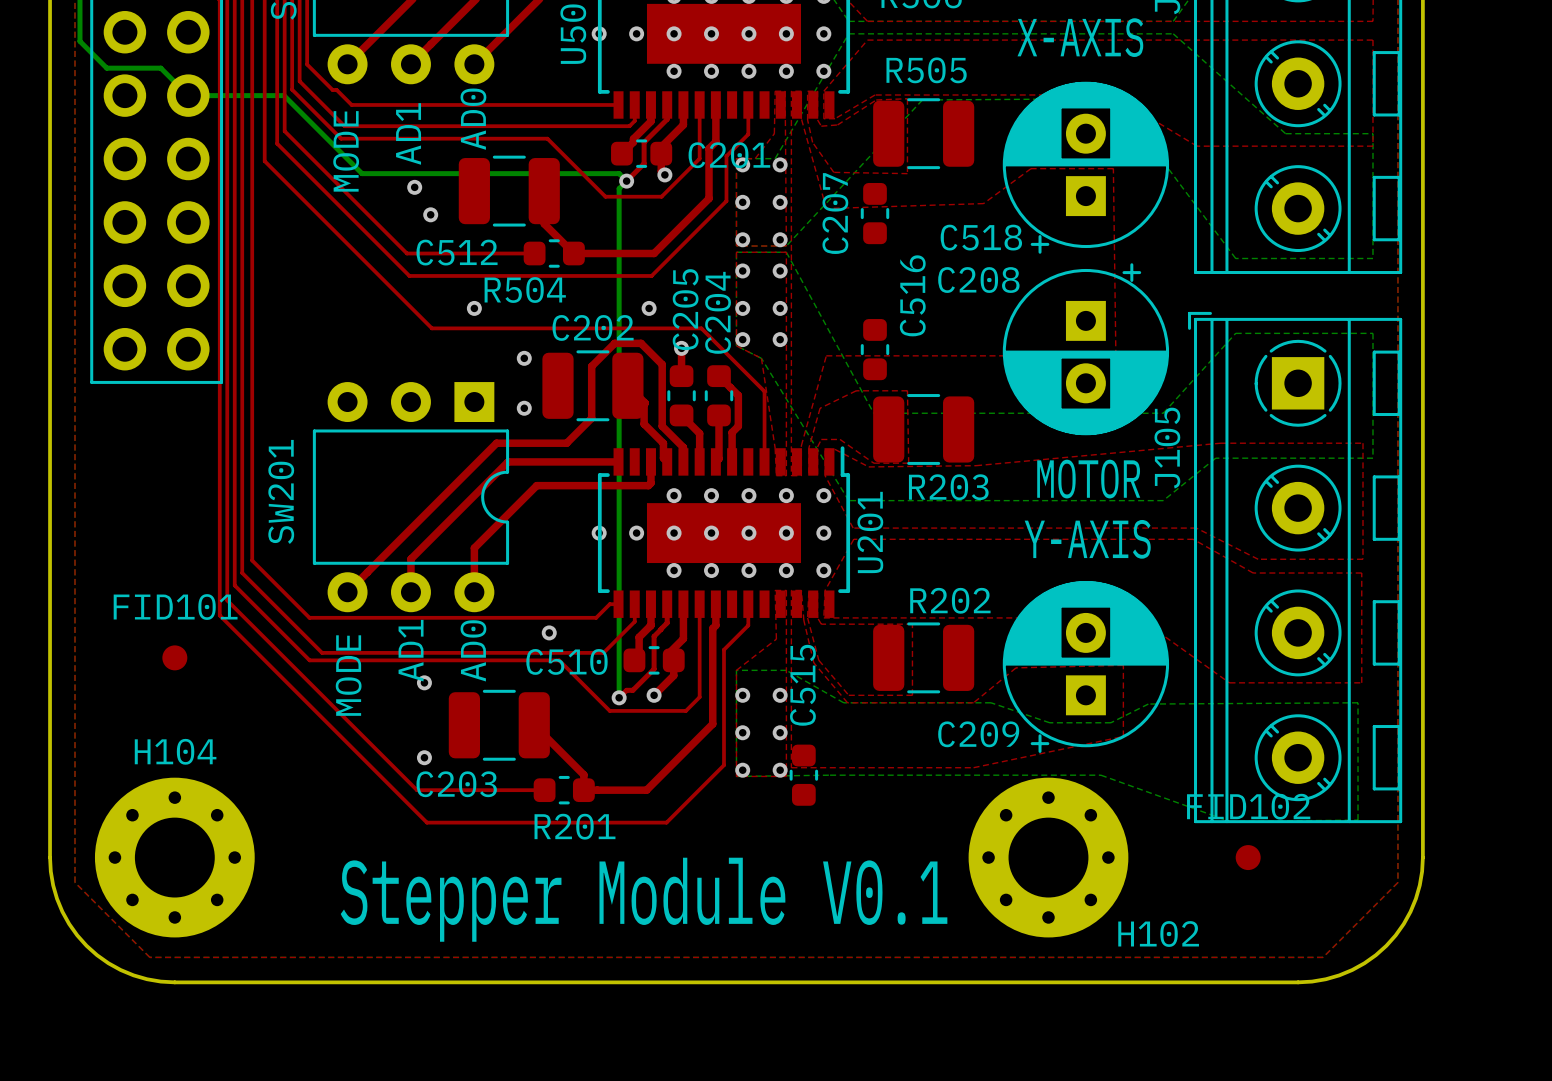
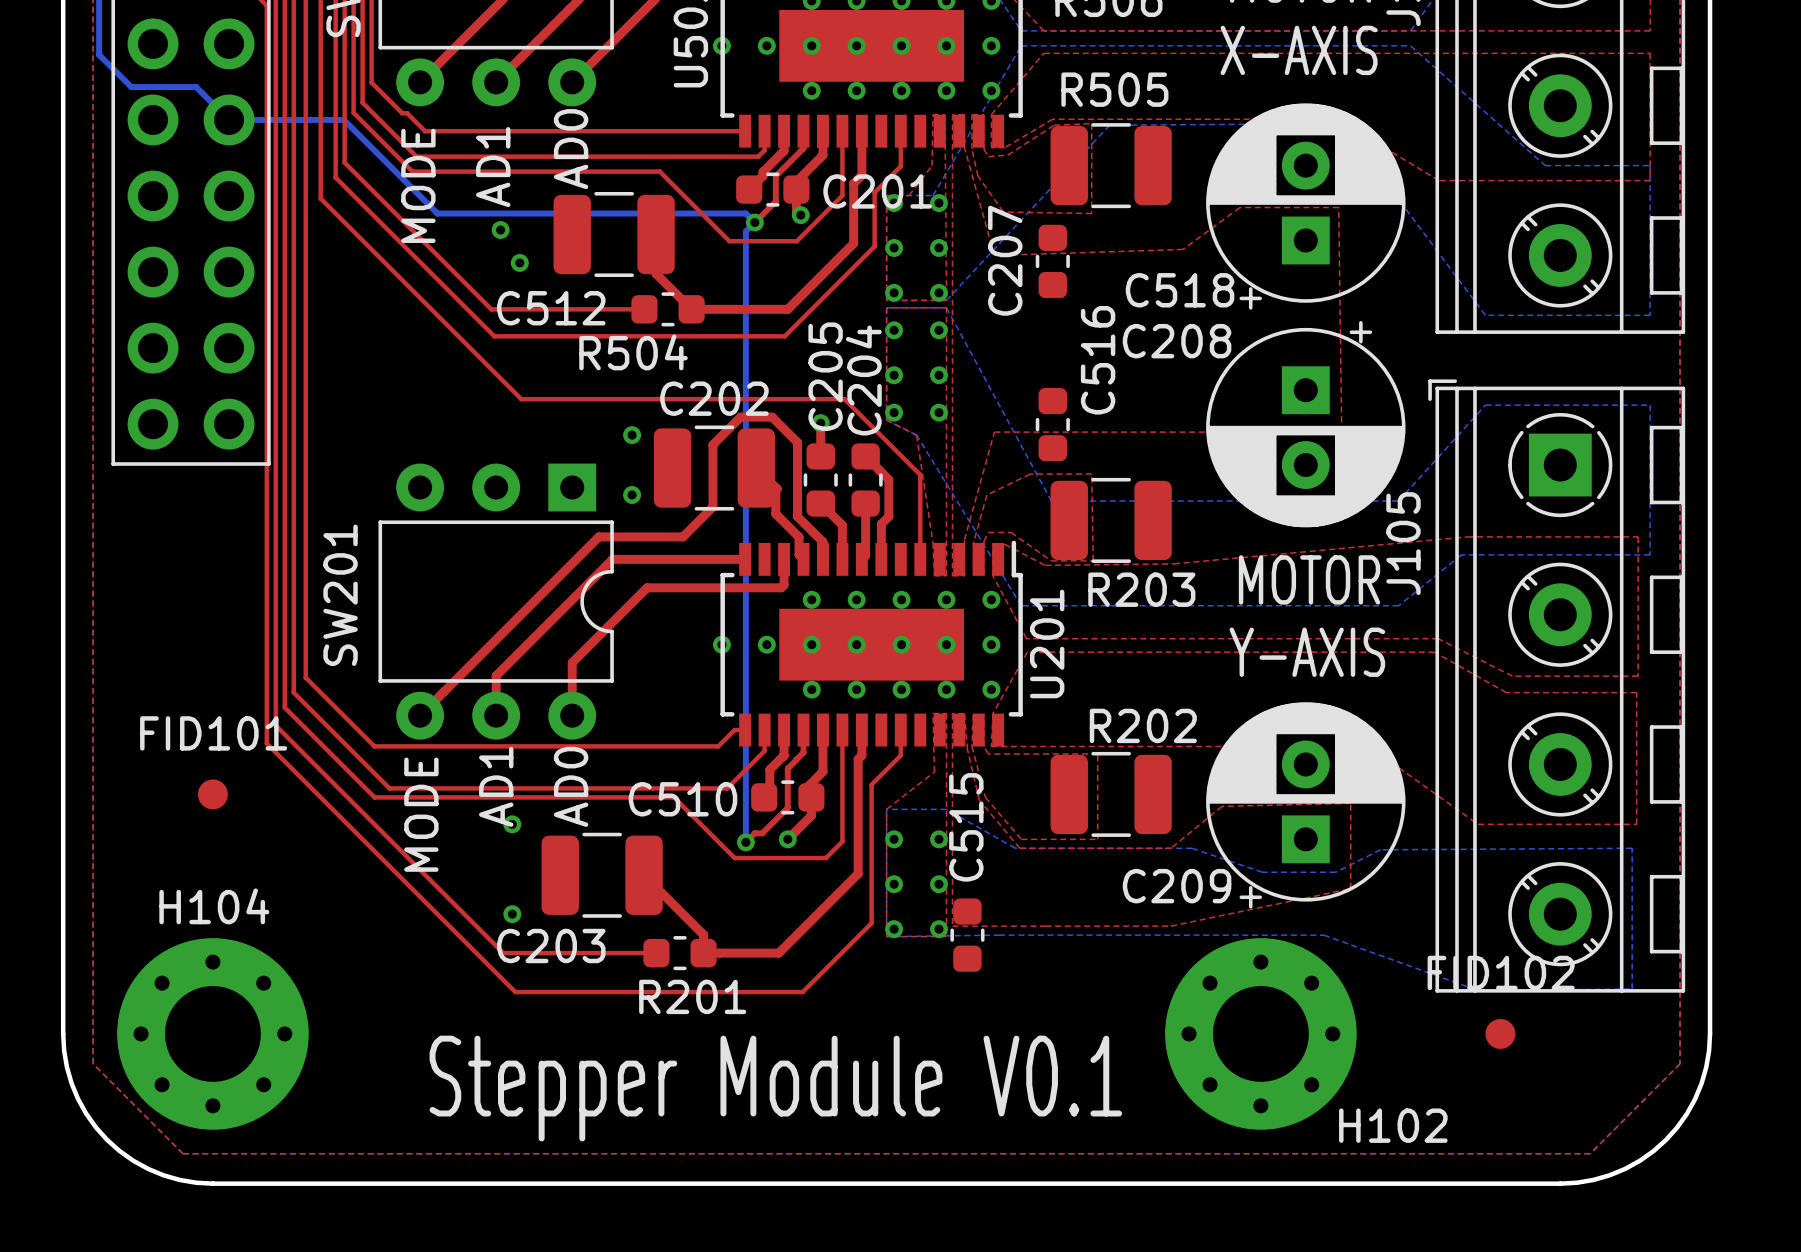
via: (474, 308) -> none
via: (649, 308) -> none
via: (549, 632) -> none

